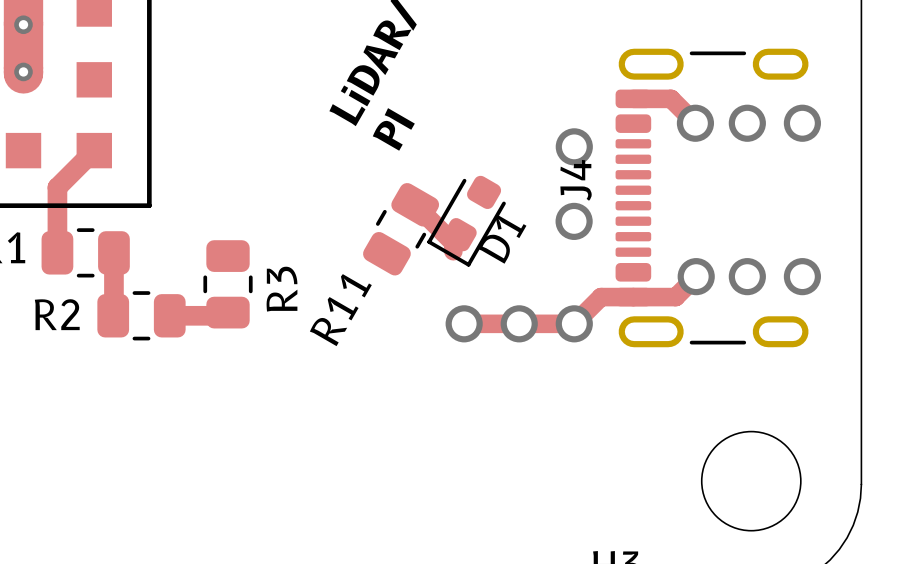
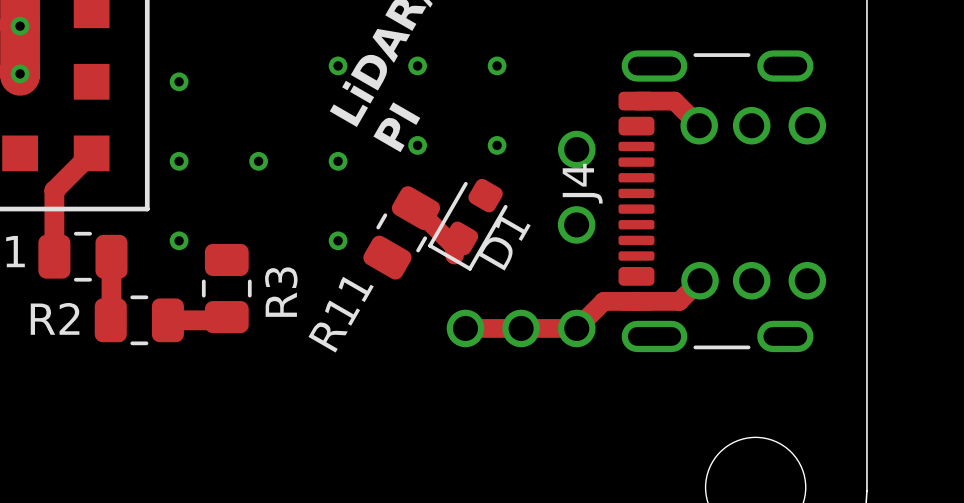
via: none -> (338, 65)
via: none -> (417, 65)
via: none -> (497, 65)
via: none -> (179, 81)
via: none -> (417, 145)
via: none -> (497, 145)
via: none -> (179, 161)
via: none -> (258, 161)
via: none -> (338, 161)
via: none -> (179, 240)
via: none -> (338, 240)

